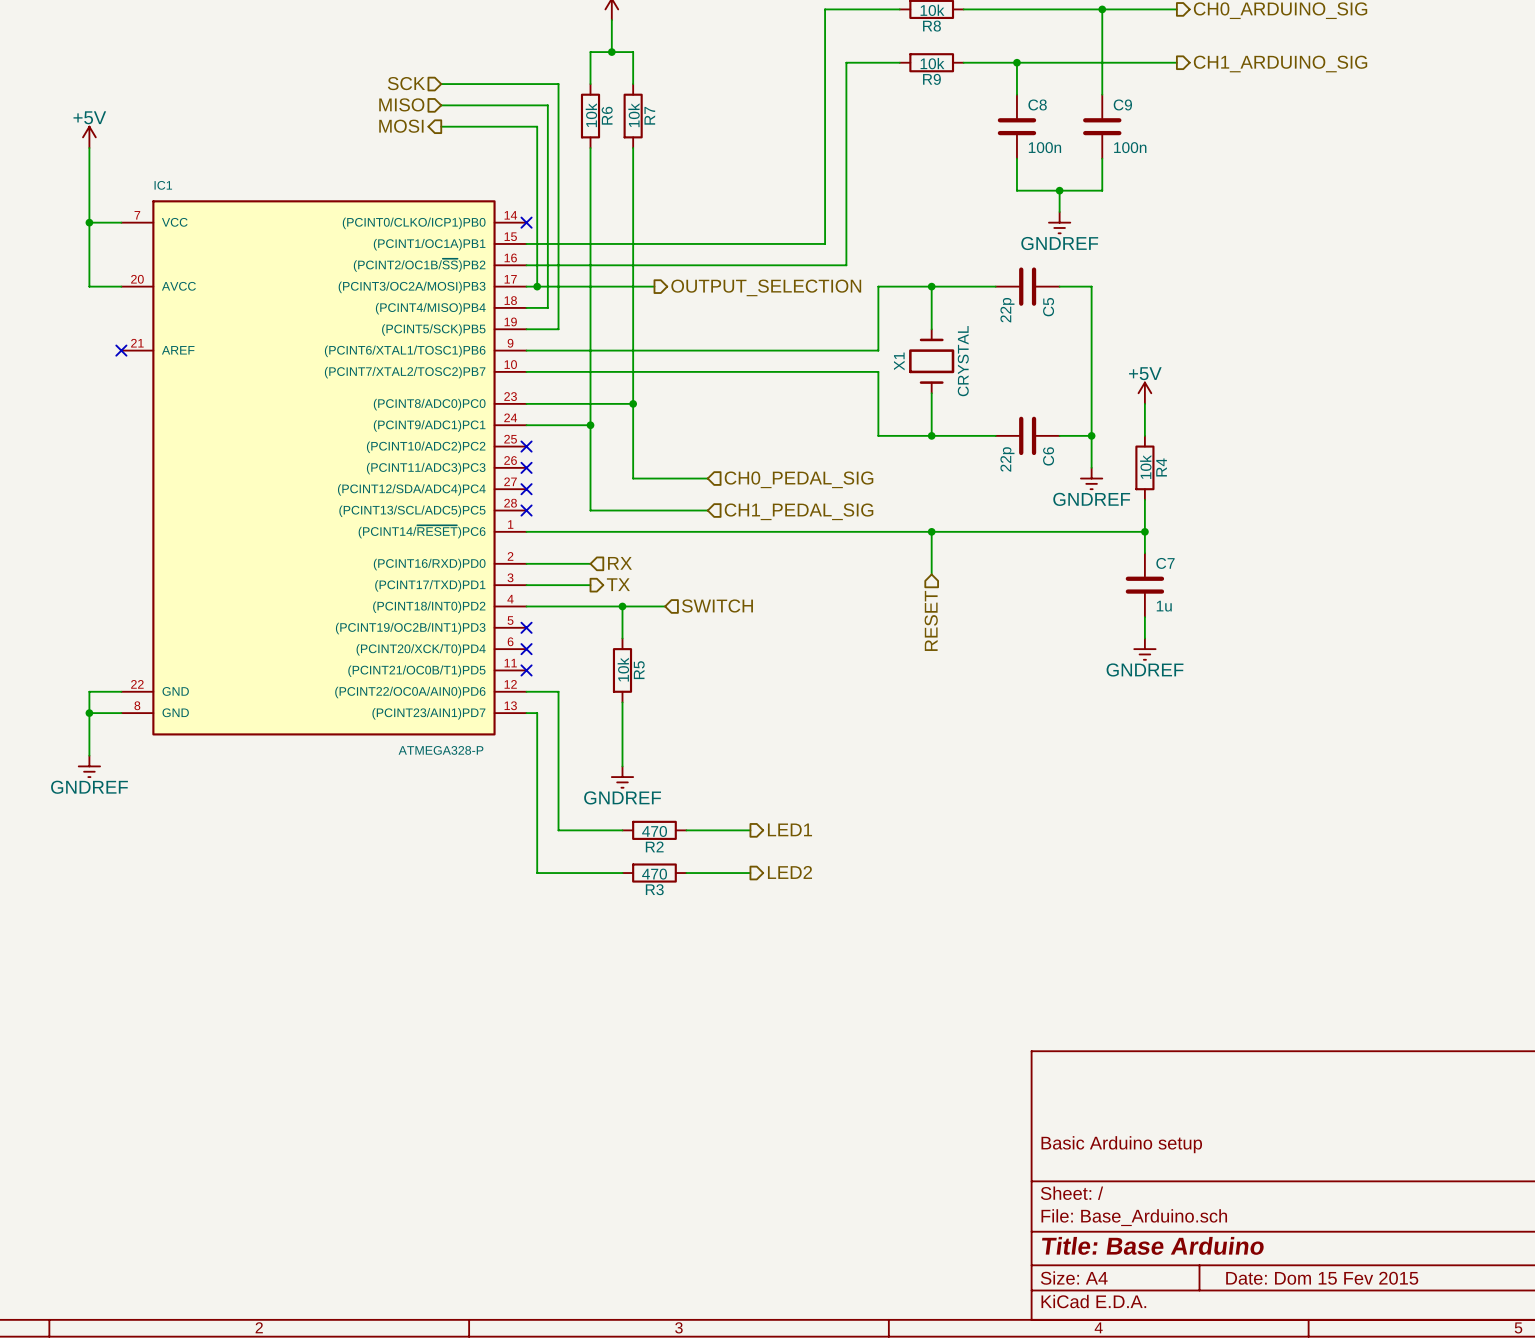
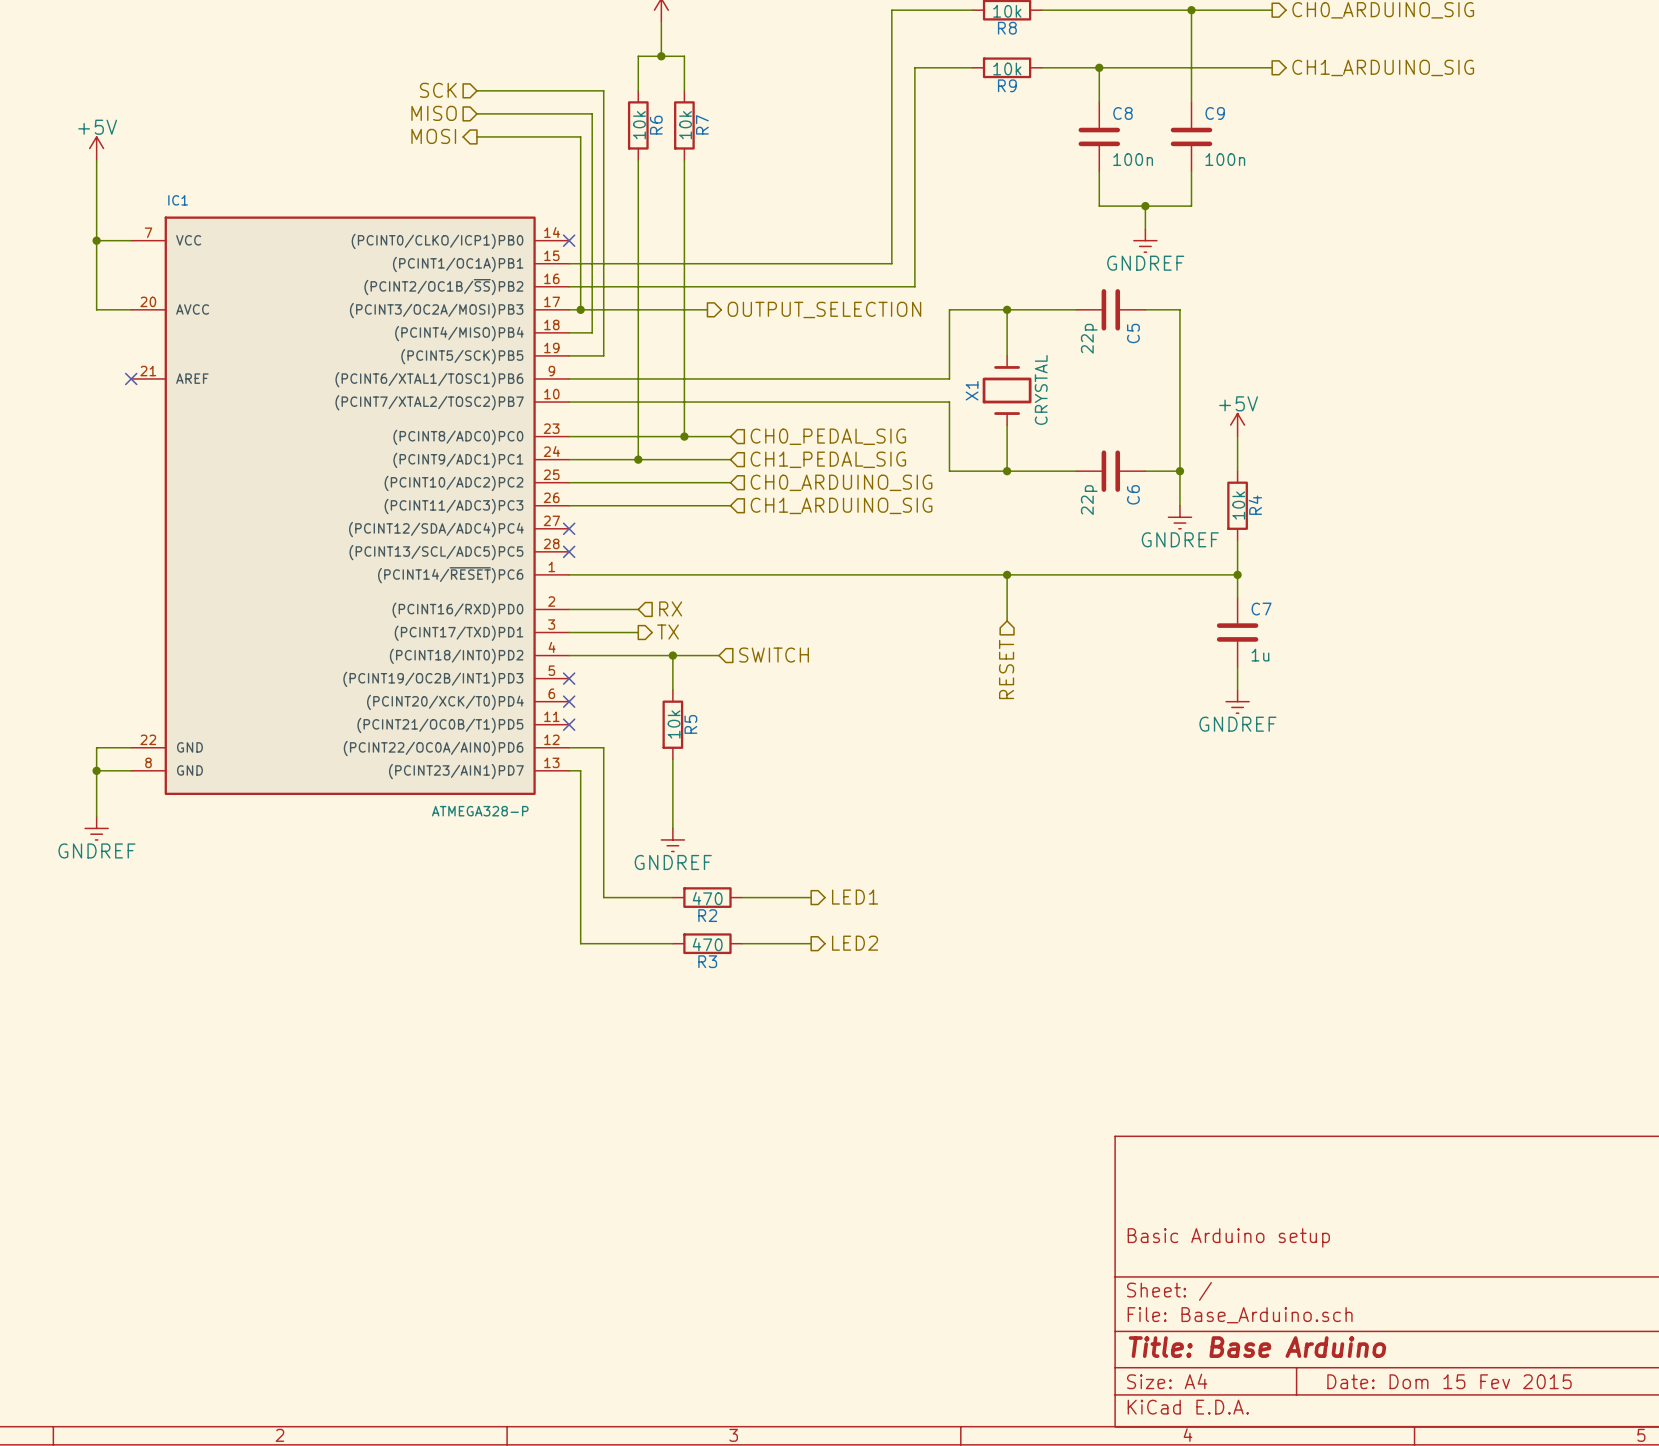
wire: (633, 403) (633, 478) (707, 478) -> (684, 436) (730, 436)
wire: (590, 425) (590, 510) (707, 510) -> (638, 459) (730, 459)
wire: none -> (569, 482) (730, 482)
no-connect mark: (526, 446) -> none
hierarchical label: none -> CH0_ARDUINO_SIG (841, 482)
wire: none -> (569, 505) (730, 505)
no-connect mark: (526, 467) -> none
hierarchical label: none -> CH1_ARDUINO_SIG (841, 505)
hierarchical label position: CH0_PEDAL_SIG (799, 479) -> CH0_PEDAL_SIG (828, 436)
hierarchical label position: CH1_PEDAL_SIG (799, 511) -> CH1_PEDAL_SIG (828, 459)

